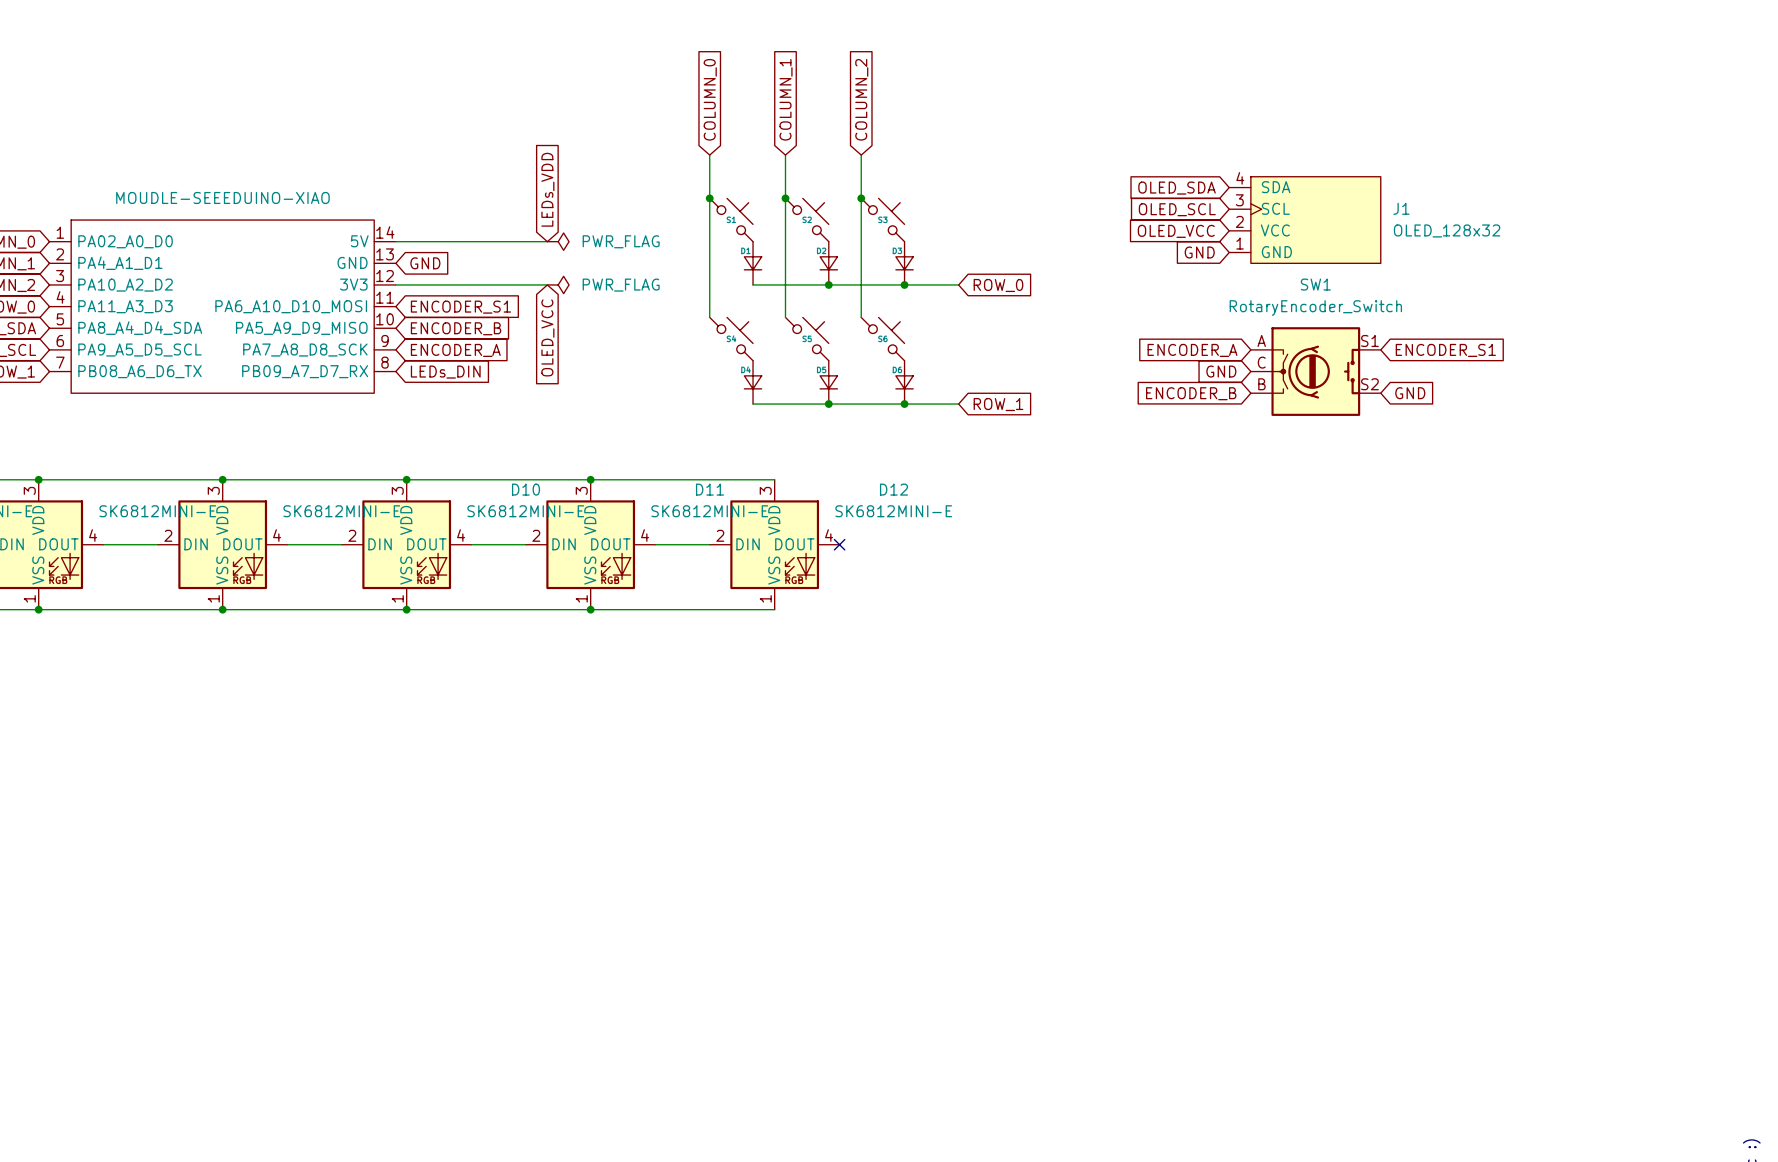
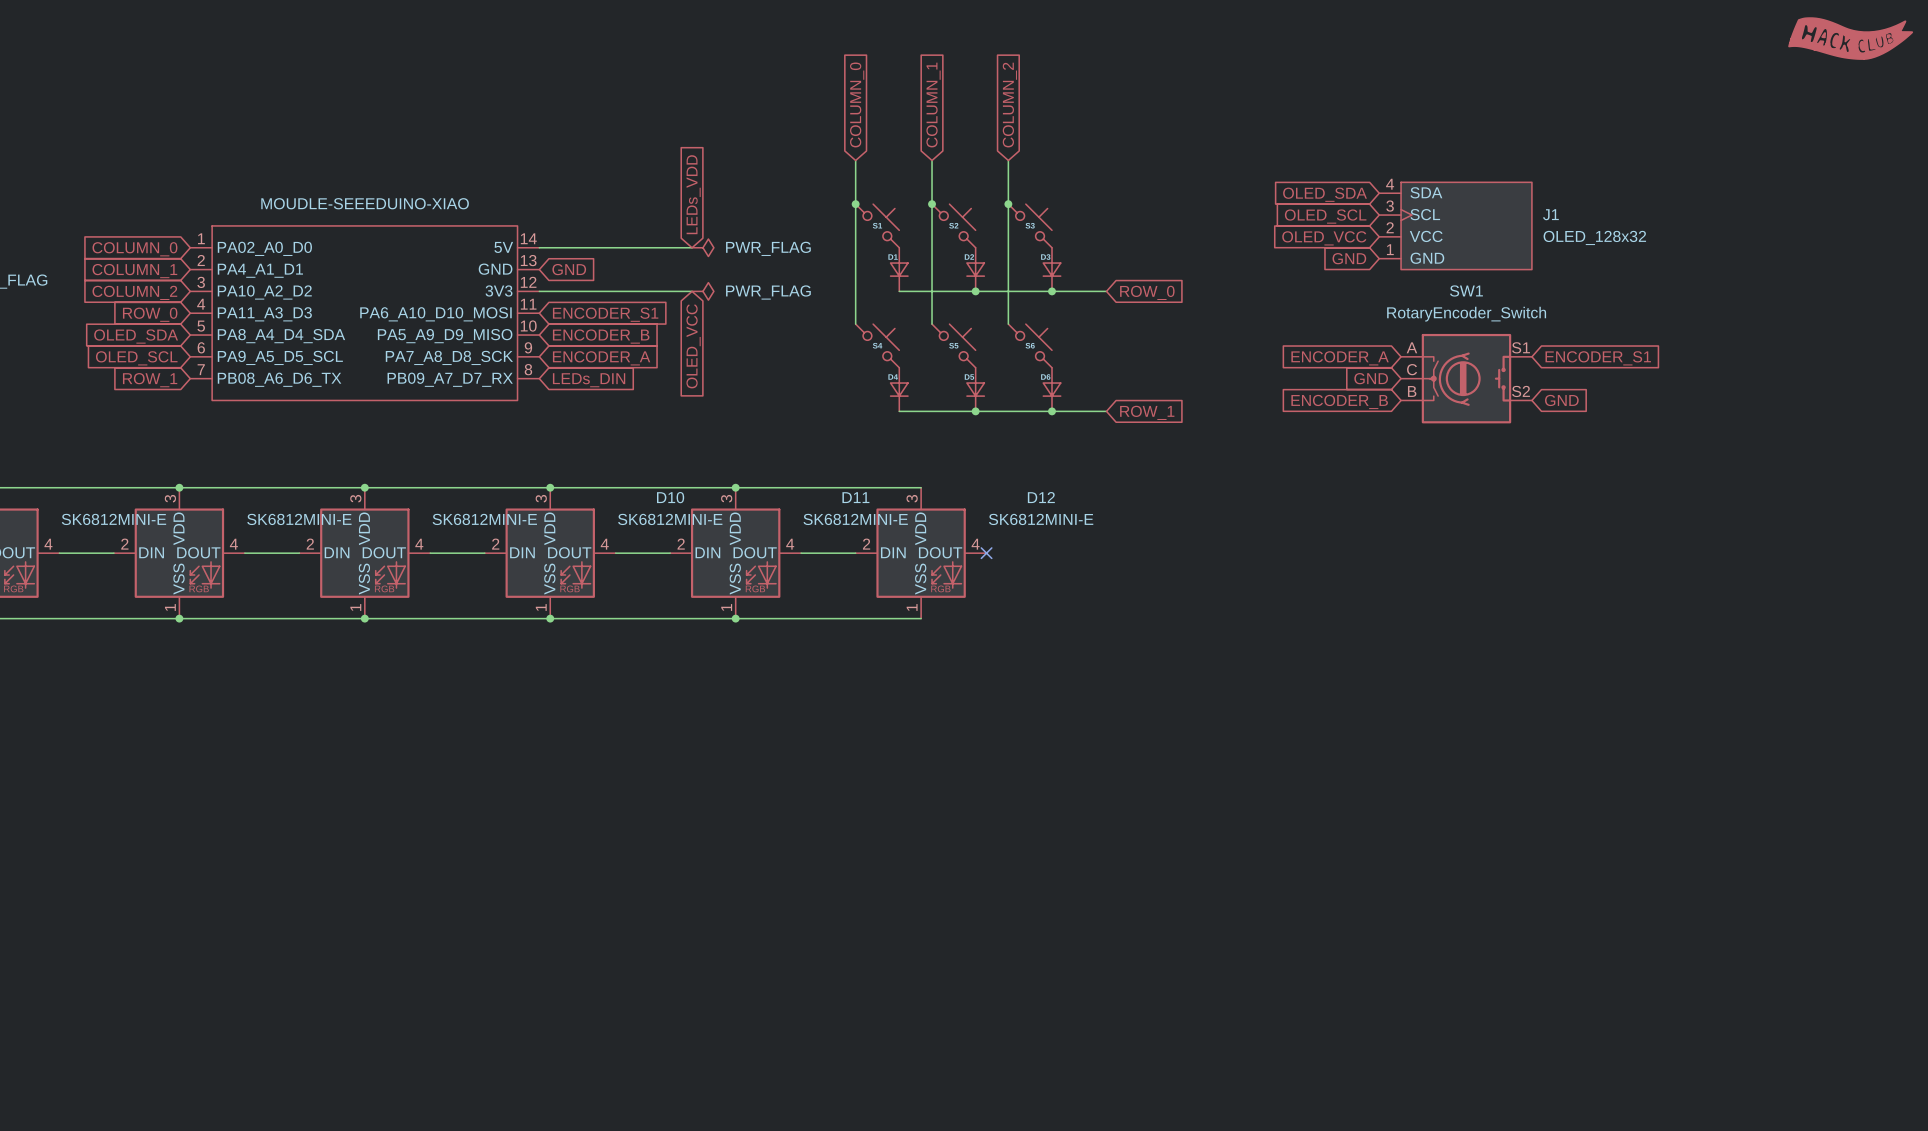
power symbol: none -> (1850, 38)

